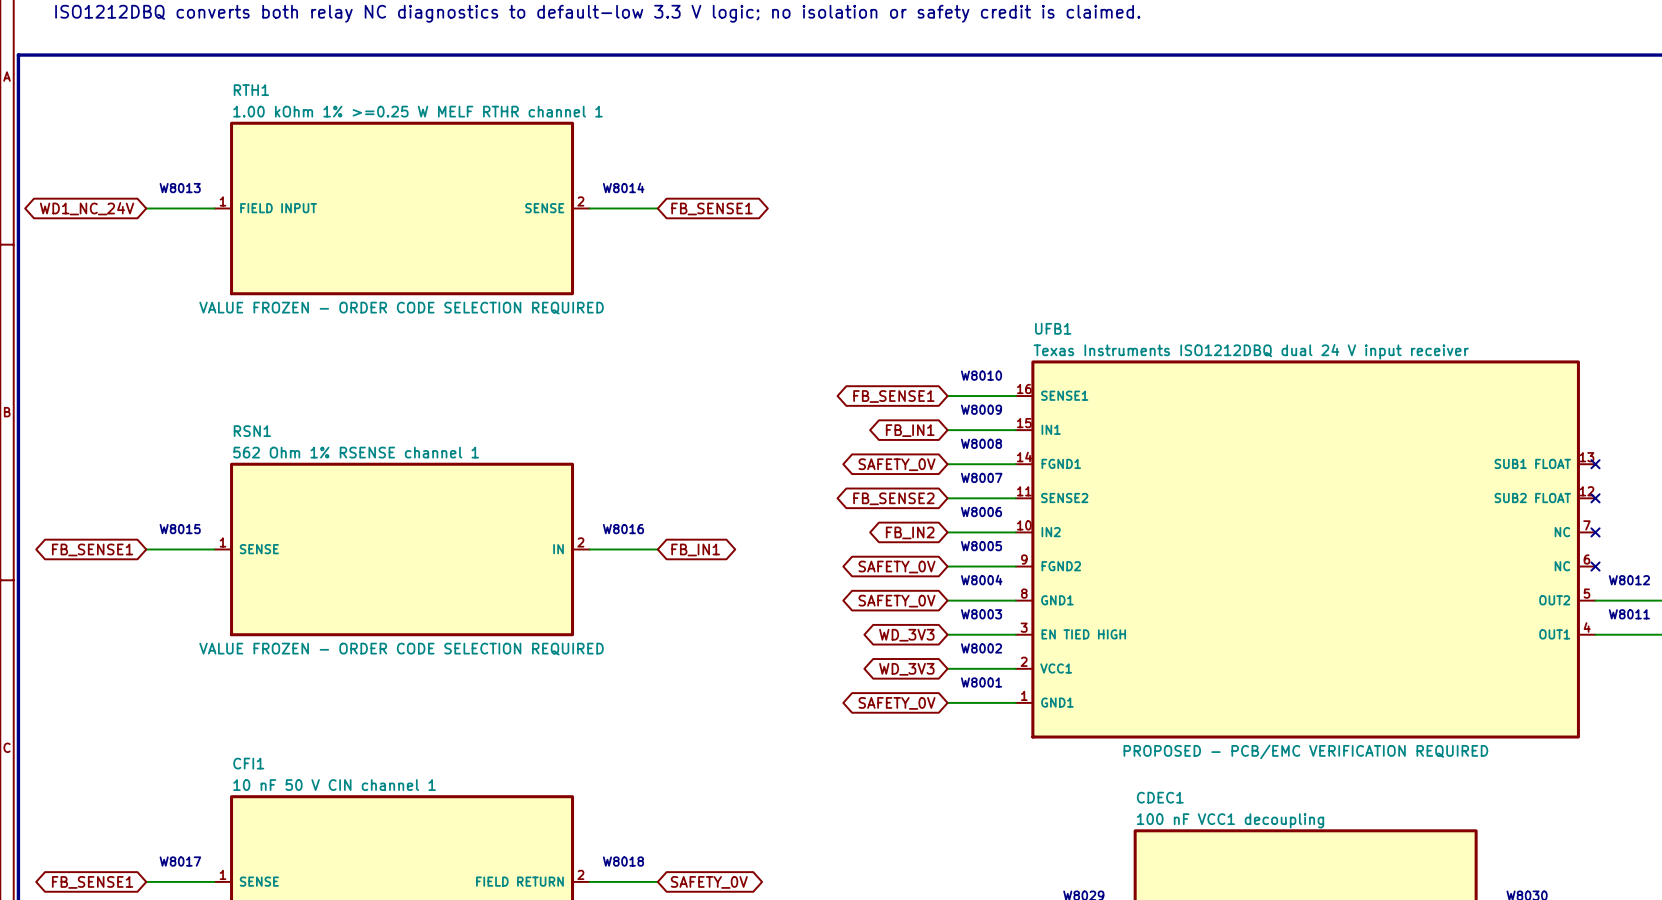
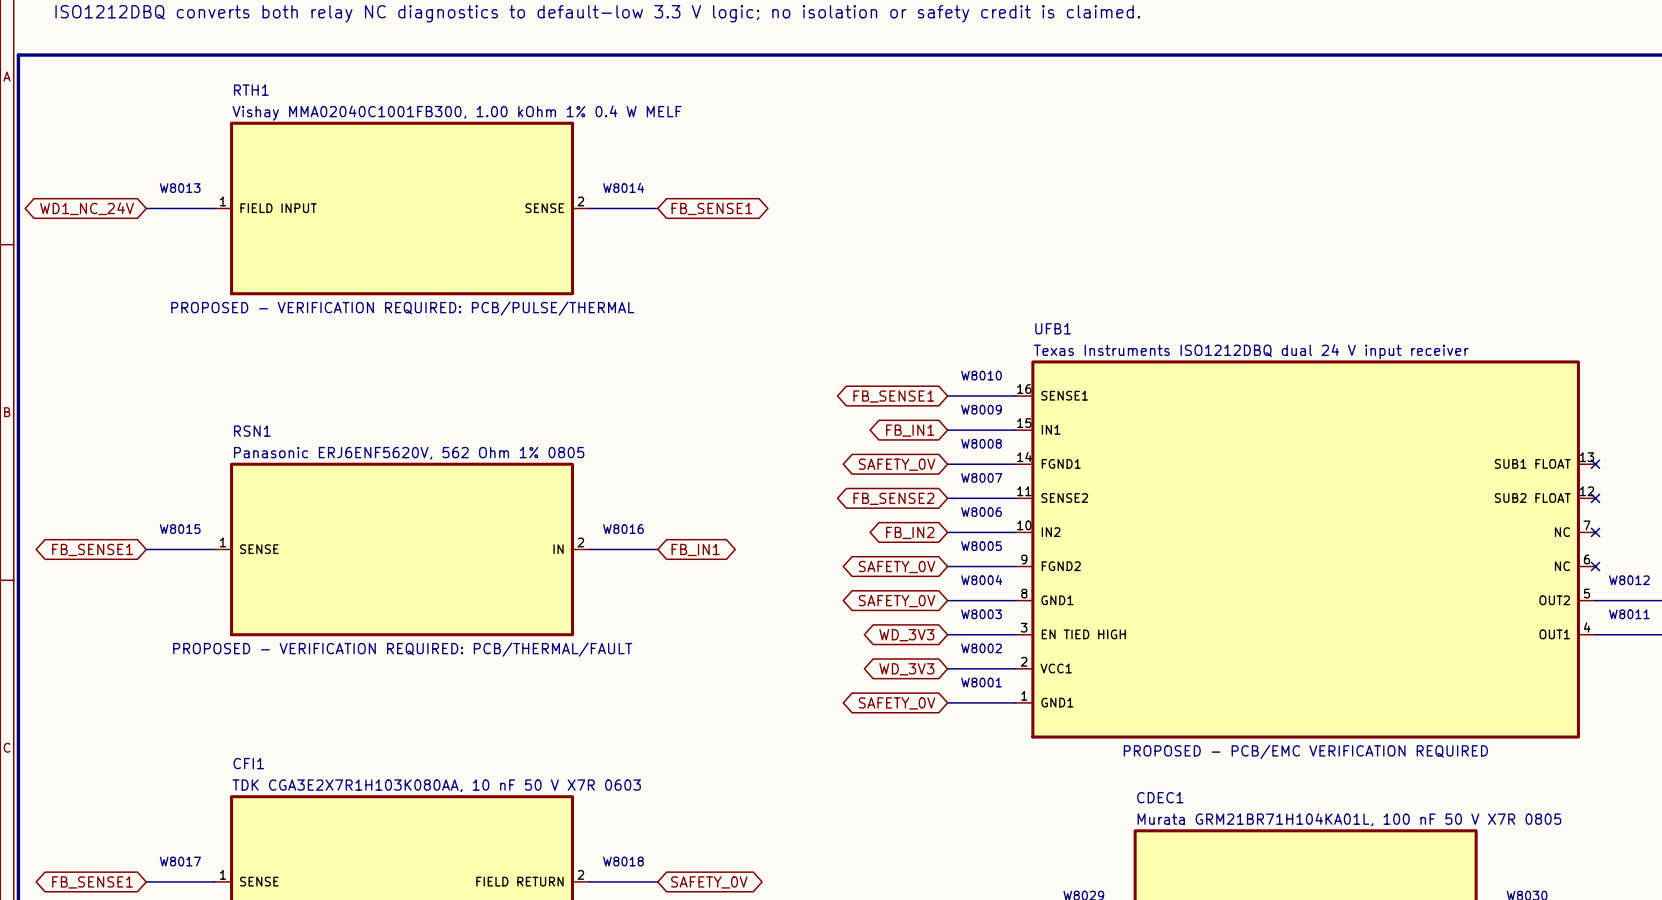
RTH1 text: 1.00 kOhm 1% >=0.25 W MELF RTHR channel 1 (418, 111) -> Vishay MMA02040C1001FB300, 1.00 kOhm 1% 0.4 W MELF (457, 113)
RTH1 text: VALUE FROZEN - ORDER CODE SELECTION REQUIRED (401, 308) -> PROPOSED - VERIFICATION REQUIRED: PCB/PULSE/THERMAL (402, 308)
RSN1 text: 562 Ohm 1% RSENSE channel 1 (356, 452) -> Panasonic ERJ6ENF5620V, 562 Ohm 1% 0805 (409, 453)
RSN1 text: VALUE FROZEN - ORDER CODE SELECTION REQUIRED (401, 649) -> PROPOSED - VERIFICATION REQUIRED: PCB/THERMAL/FAULT (402, 649)
CFI1 text: 10 nF 50 V CIN channel 1 (334, 785) -> TDK CGA3E2X7R1H103K080AA, 10 nF 50 V X7R 0603 (436, 785)
CDEC1 text: 100 nF VCC1 decoupling (1230, 820) -> Murata GRM21BR71H104KA01L, 100 nF 50 V X7R 0805 (1349, 819)

